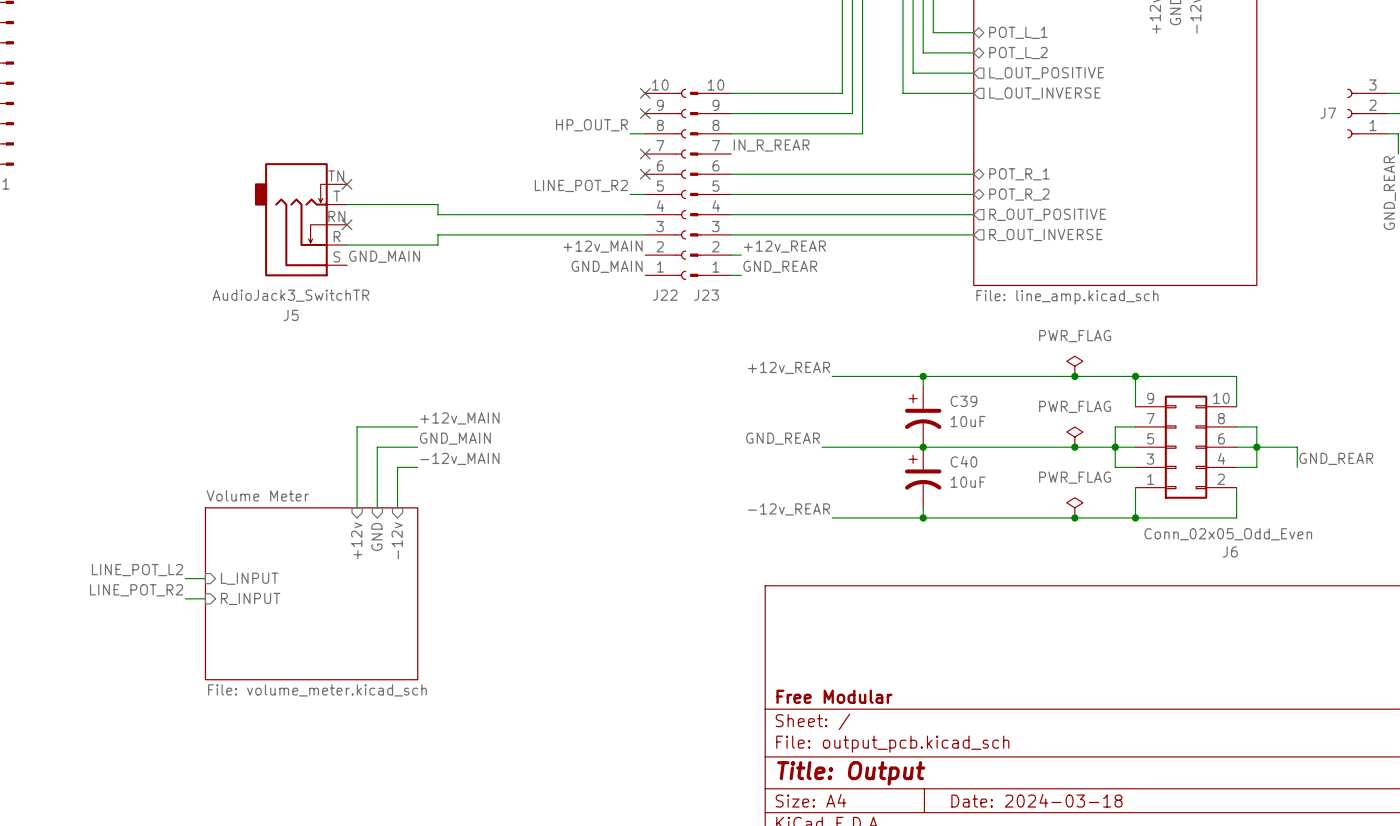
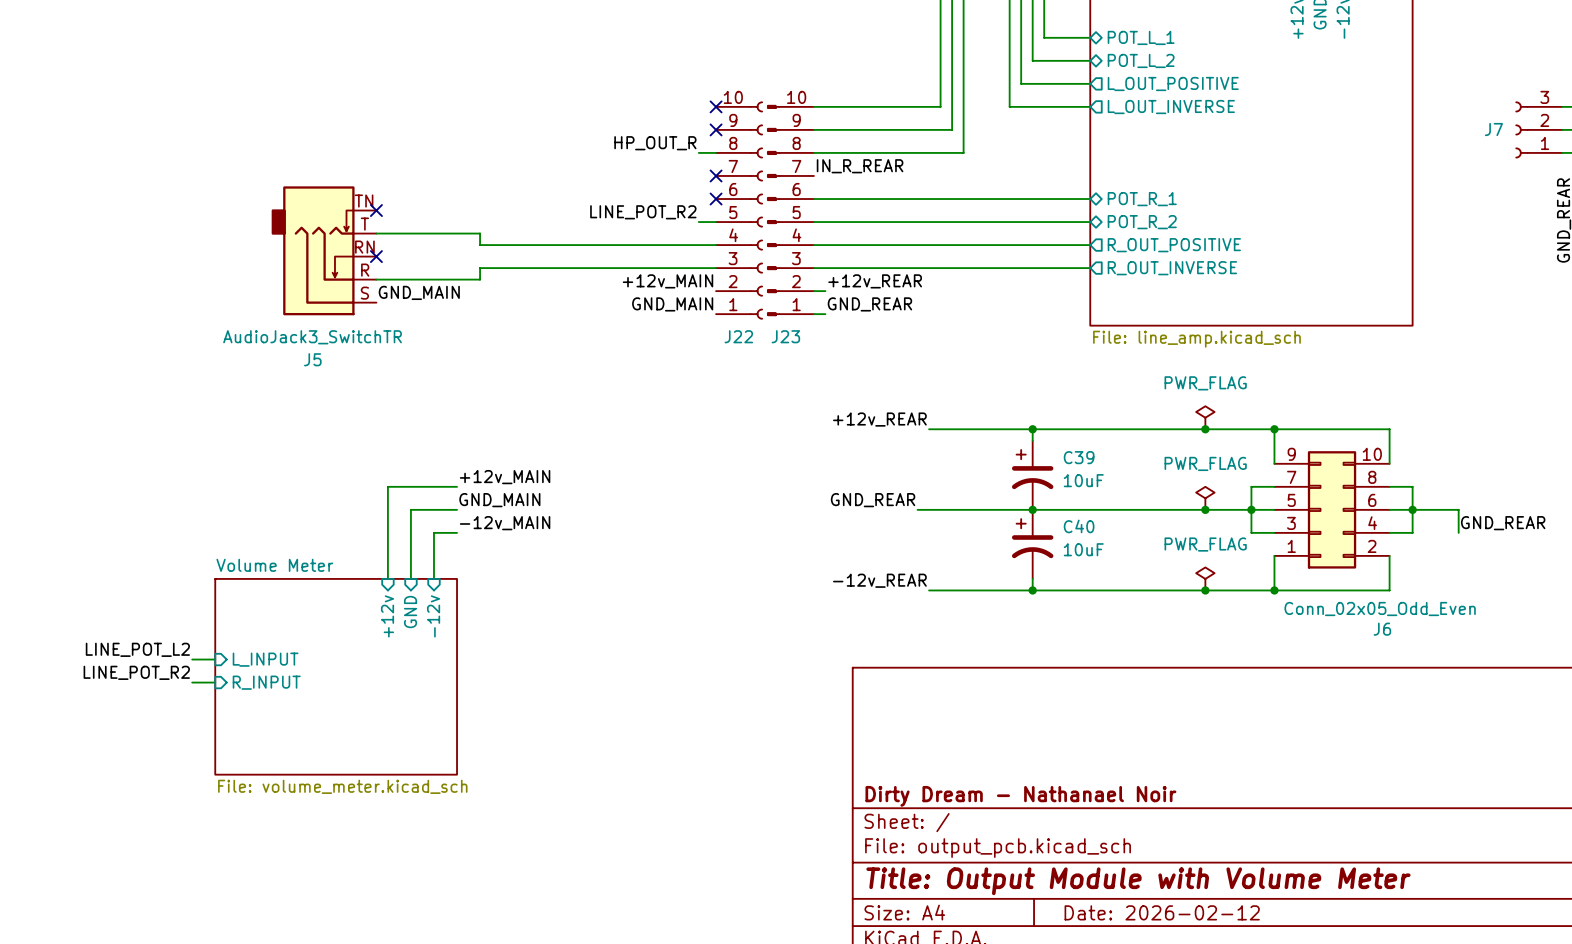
title block: Free Modular (834, 696) -> Dirty Dream - Nathanael Noir (1020, 796)
title block: Title: Output (851, 773) -> Title: Output Module with Volume Meter (1138, 881)
title block: Date: 2024-03-18 (1036, 800) -> Date: 2026-02-12 (1162, 912)

